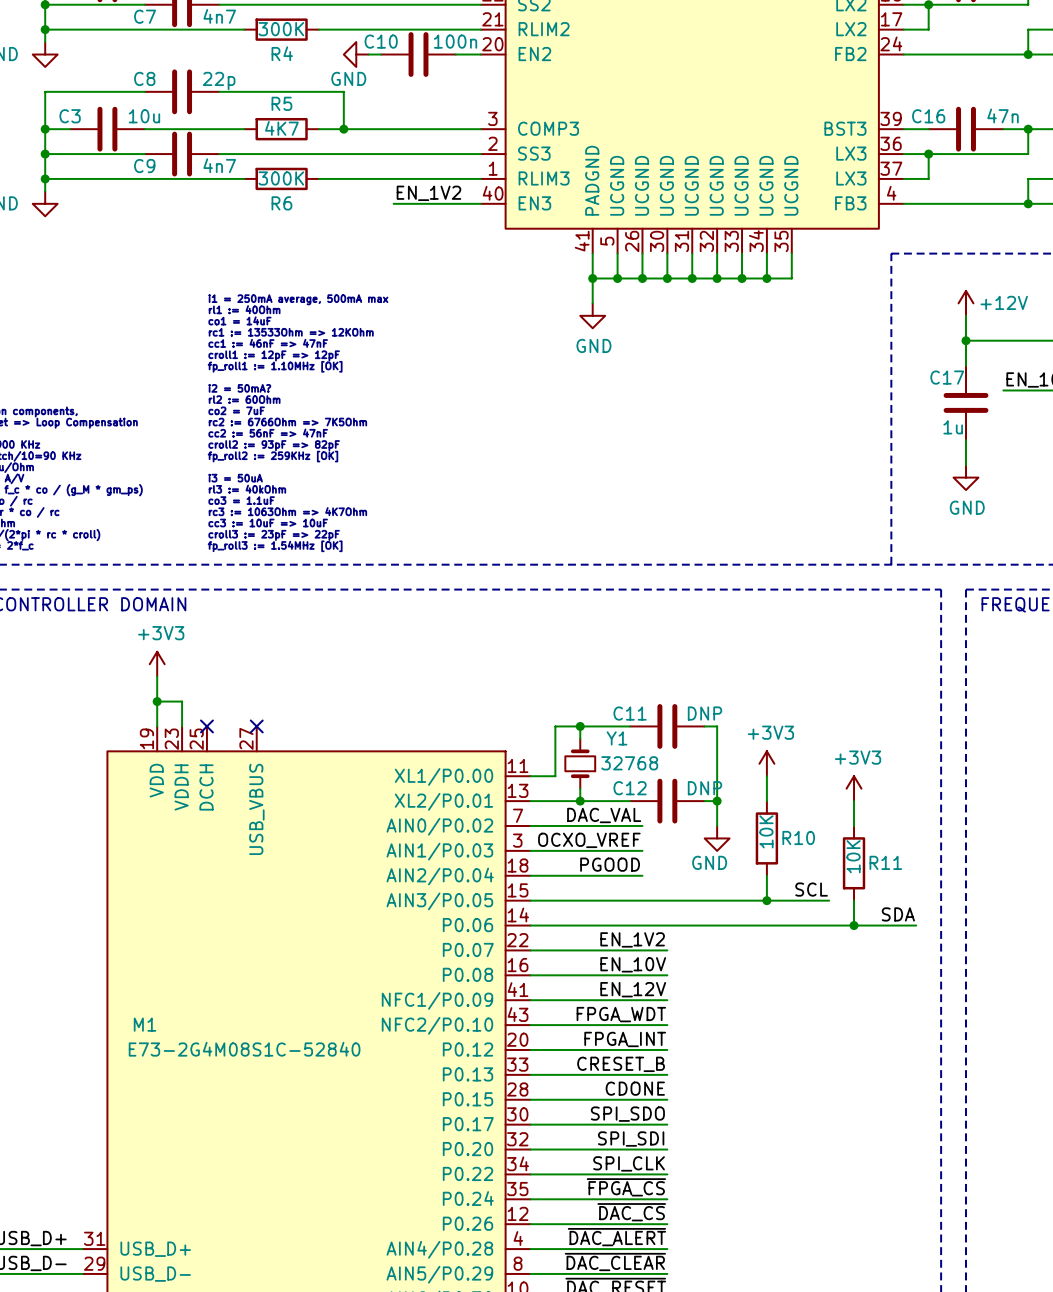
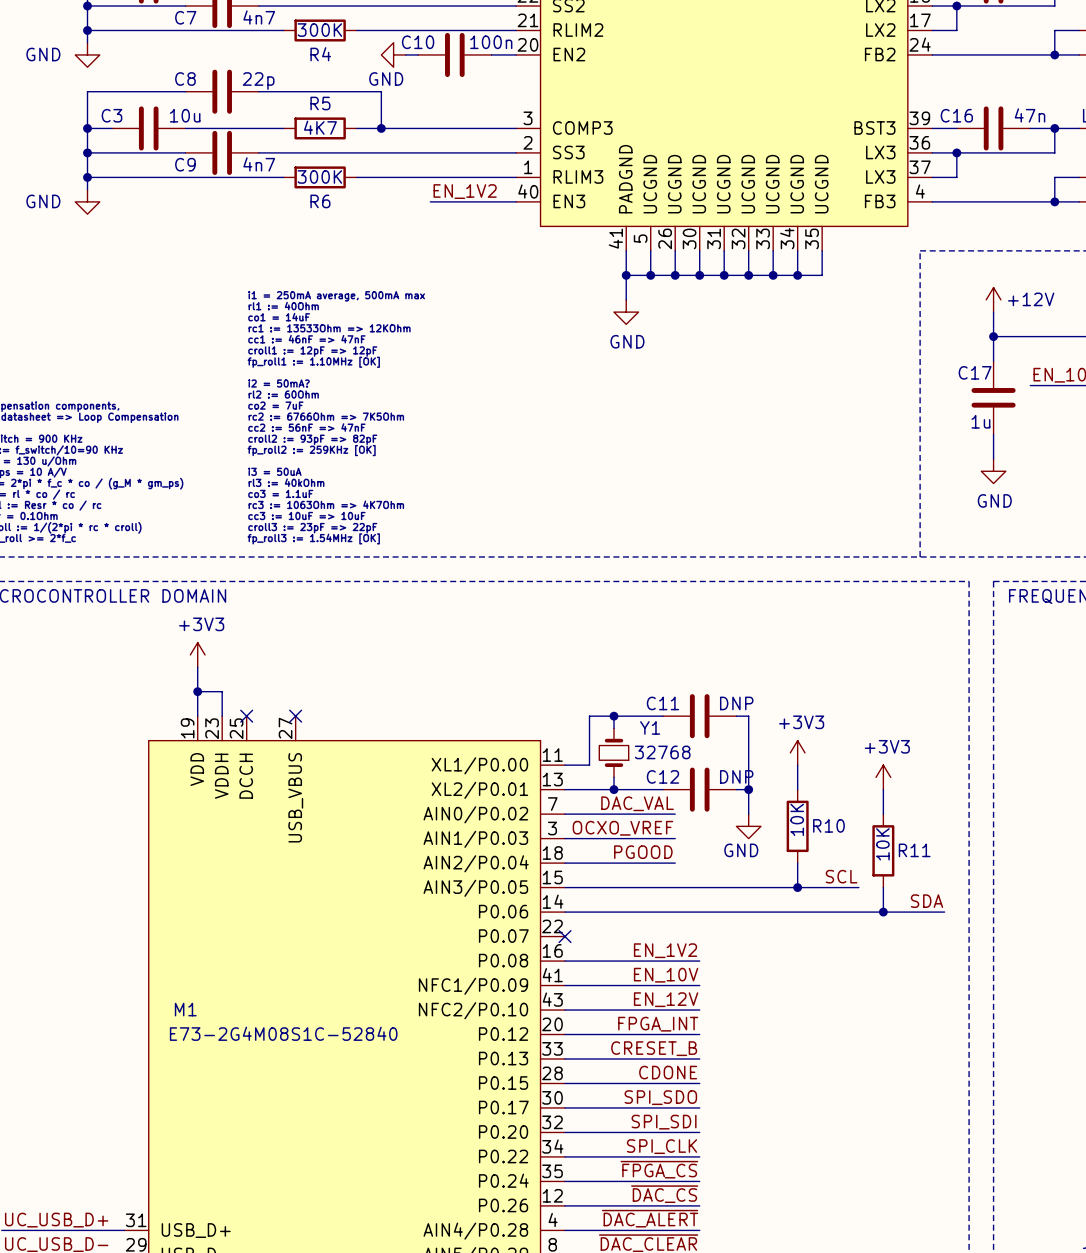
label: EN_1V2 (632, 939) -> none
wire: (530, 950) (667, 950) -> none
no-connect mark: none -> (565, 936)
label: EN_10V (633, 964) -> EN_1V2 (665, 950)
label: EN_12V (633, 989) -> EN_10V (666, 975)
label: FPGA_WDT (621, 1014) -> EN_12V (666, 999)

